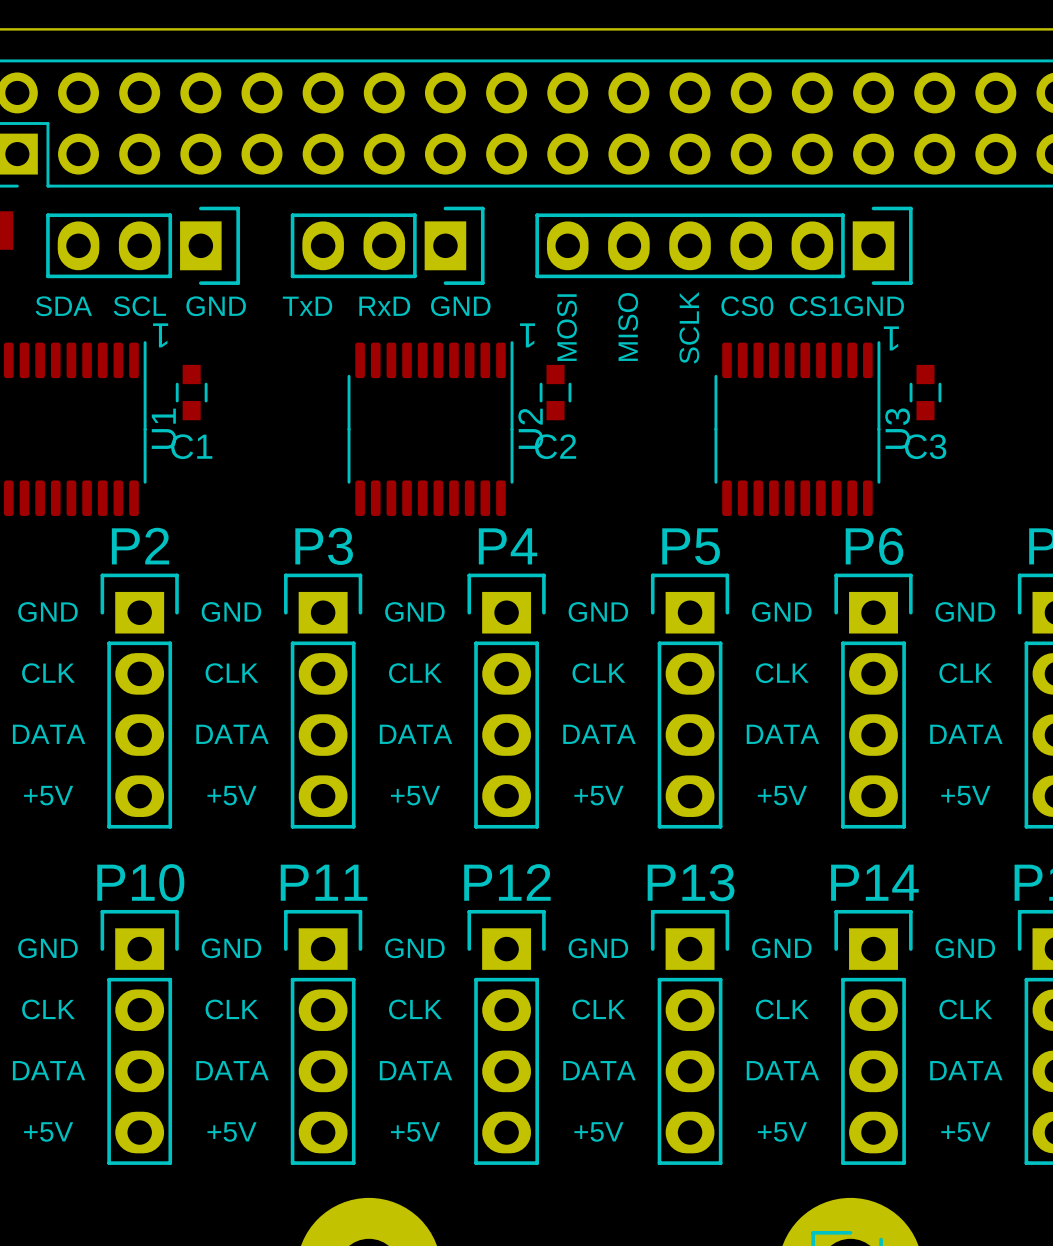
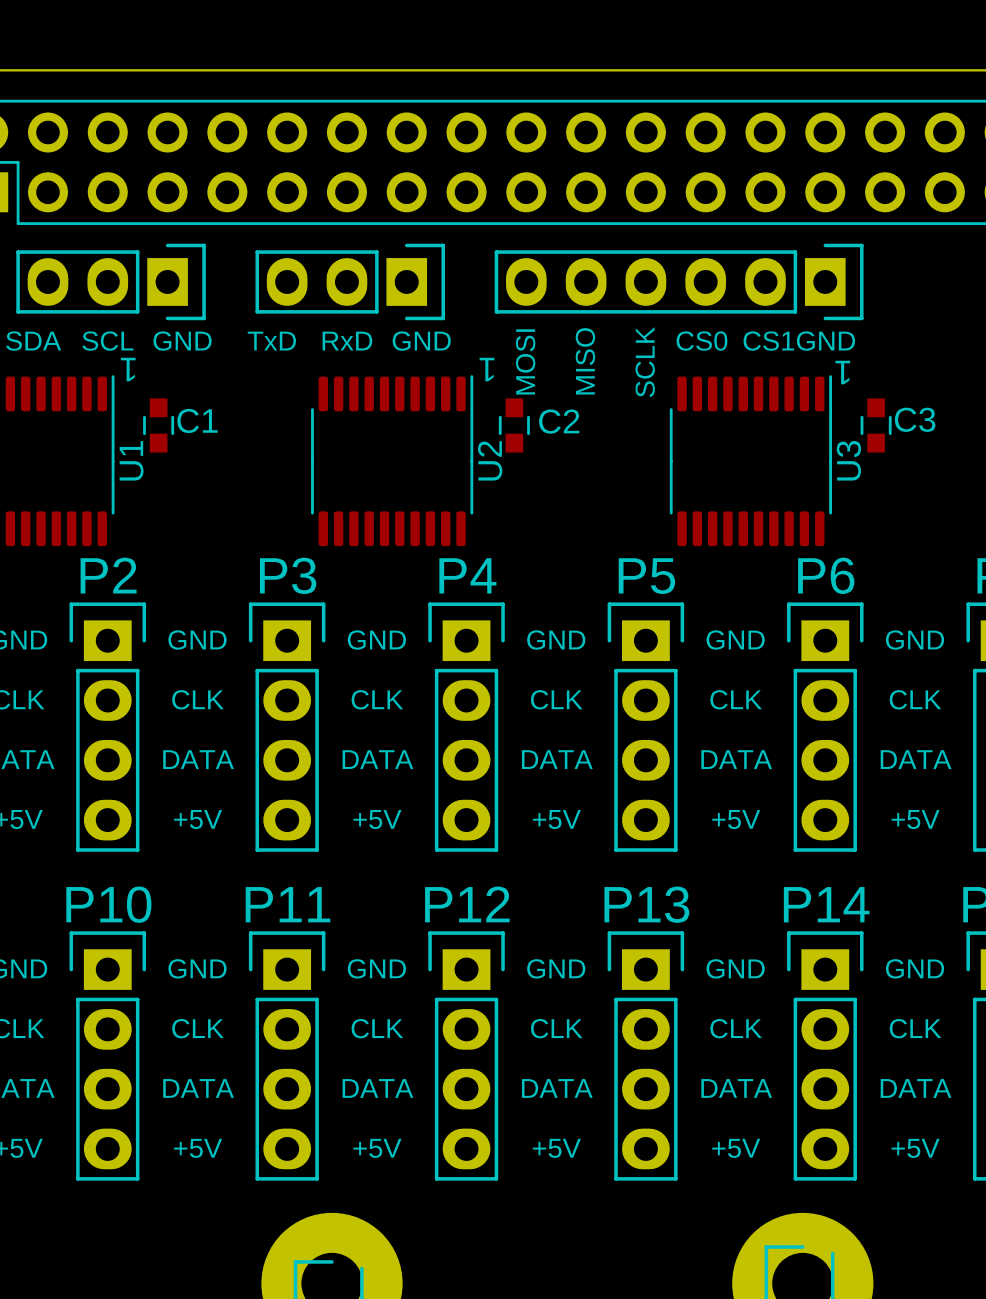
C1 name position: C1 (191, 446) -> C1 (197, 420)
C2 name position: C2 (555, 446) -> C2 (559, 421)
C3 name position: C3 (925, 446) -> C3 (915, 419)

